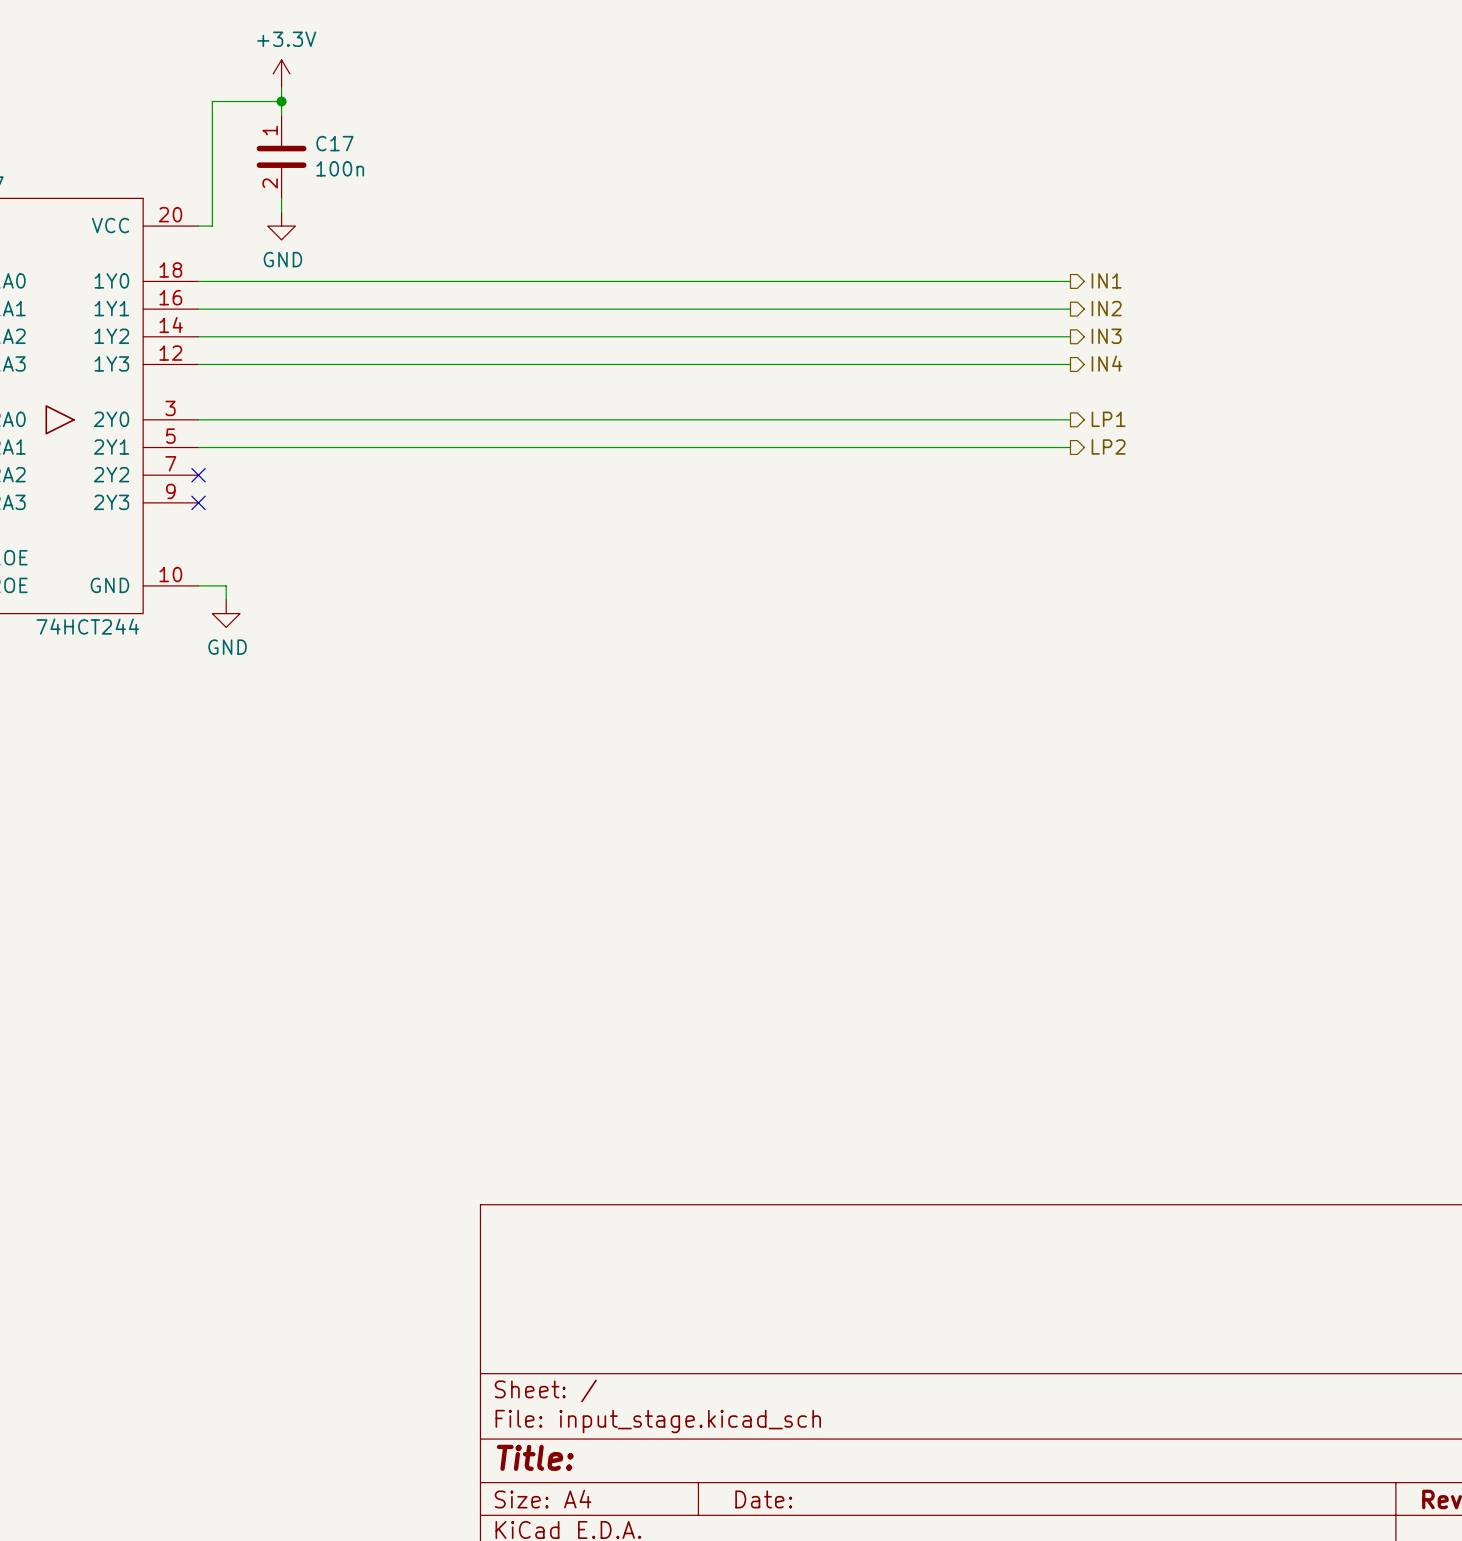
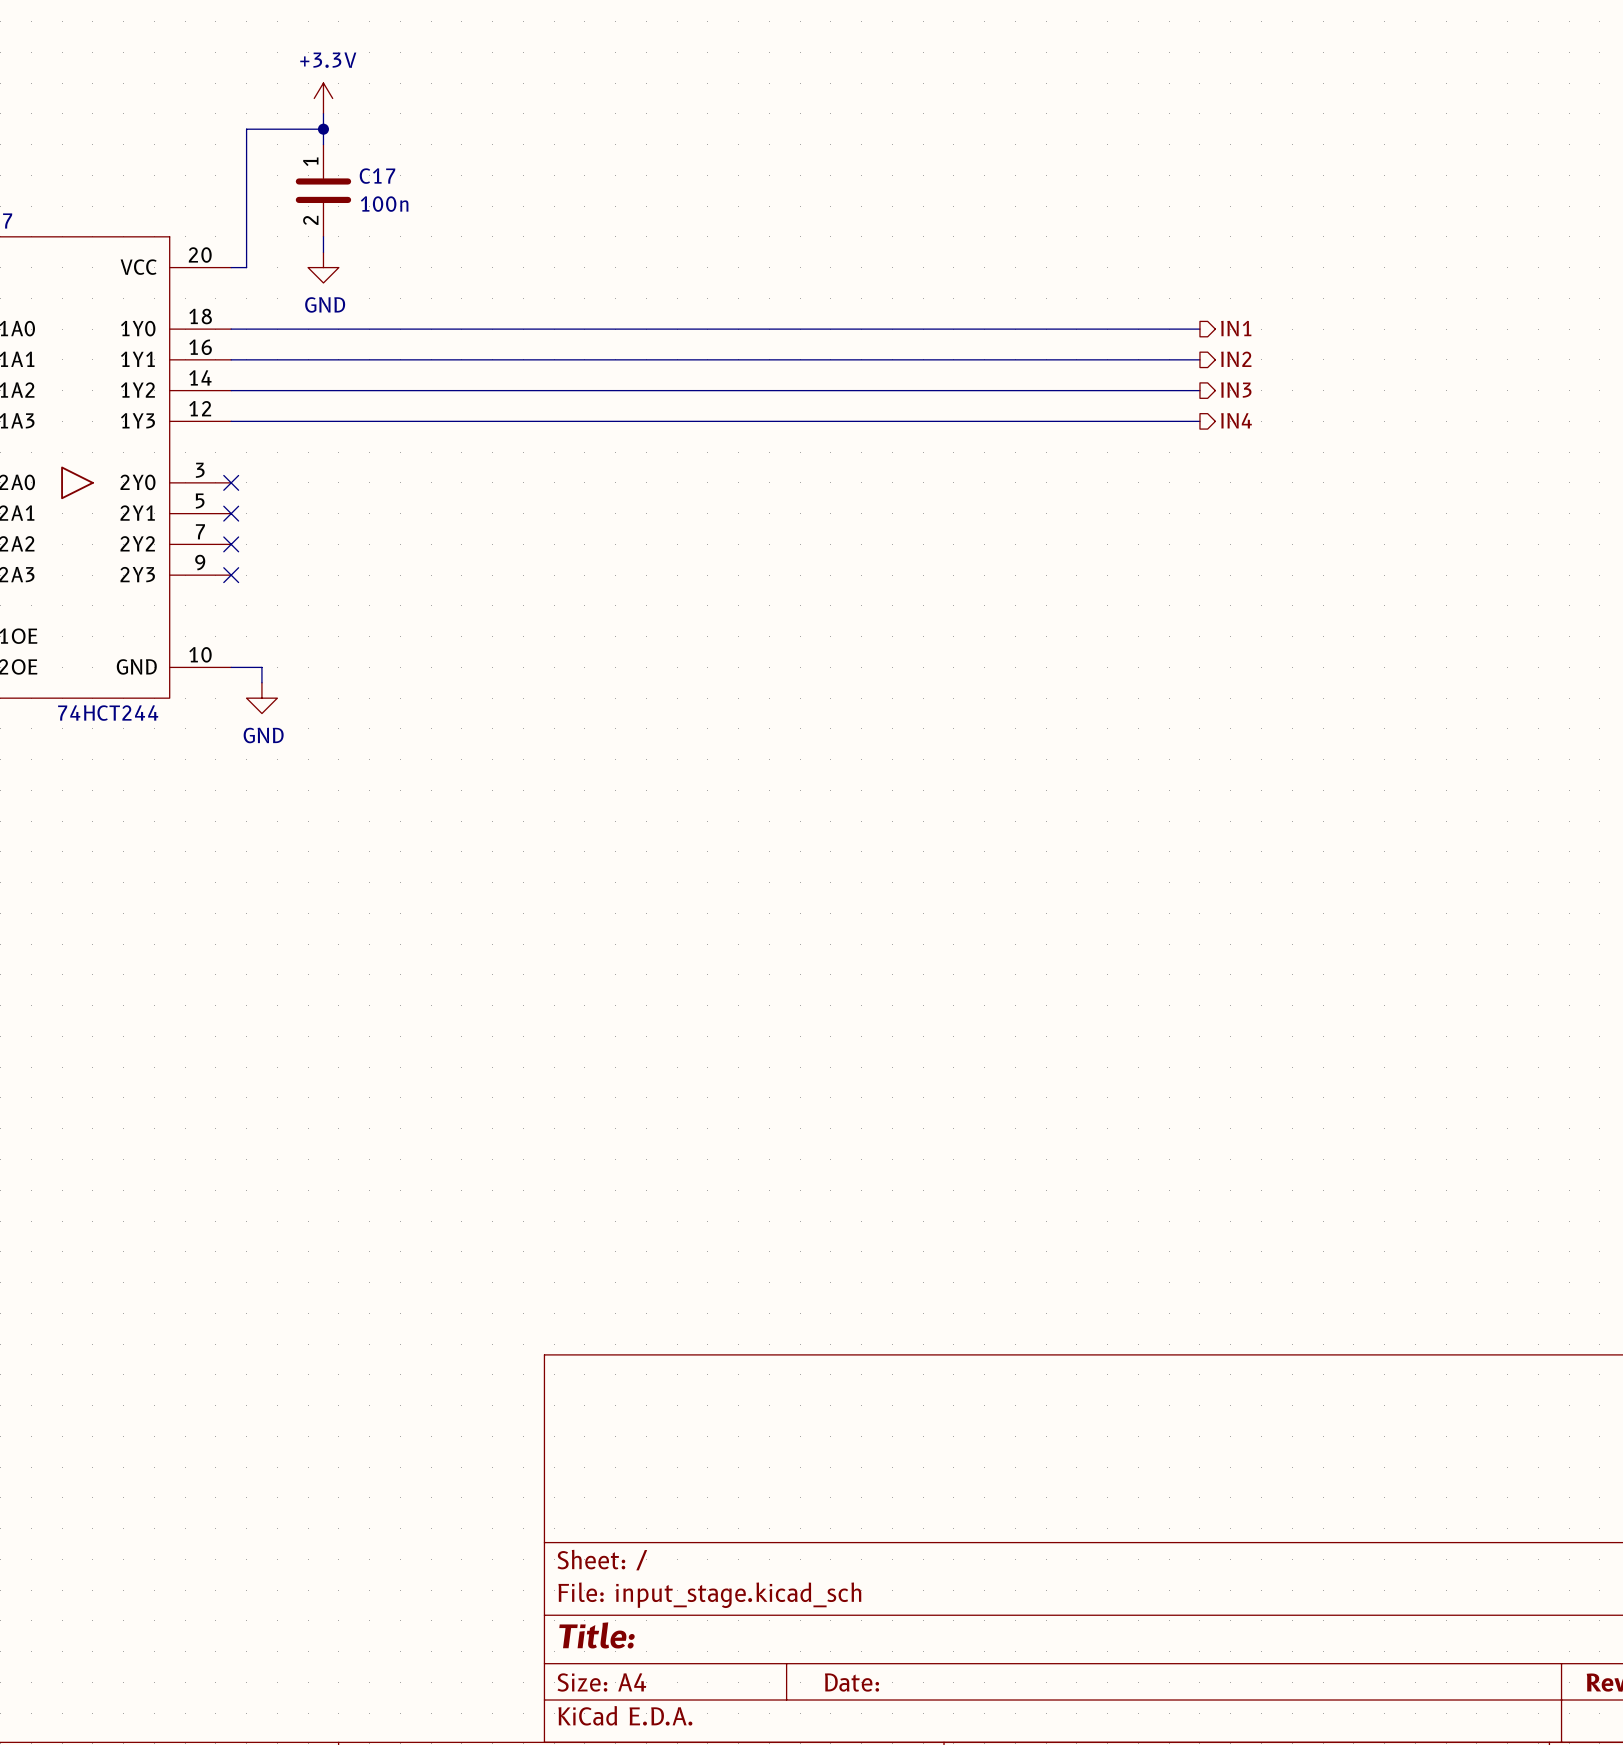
wire: (198, 419) (1070, 419) -> none
no-connect mark: none -> (231, 482)
hierarchical label: LP1 (1108, 419) -> none
wire: (198, 447) (1070, 447) -> none
no-connect mark: none -> (231, 513)
hierarchical label: LP2 (1108, 447) -> none

